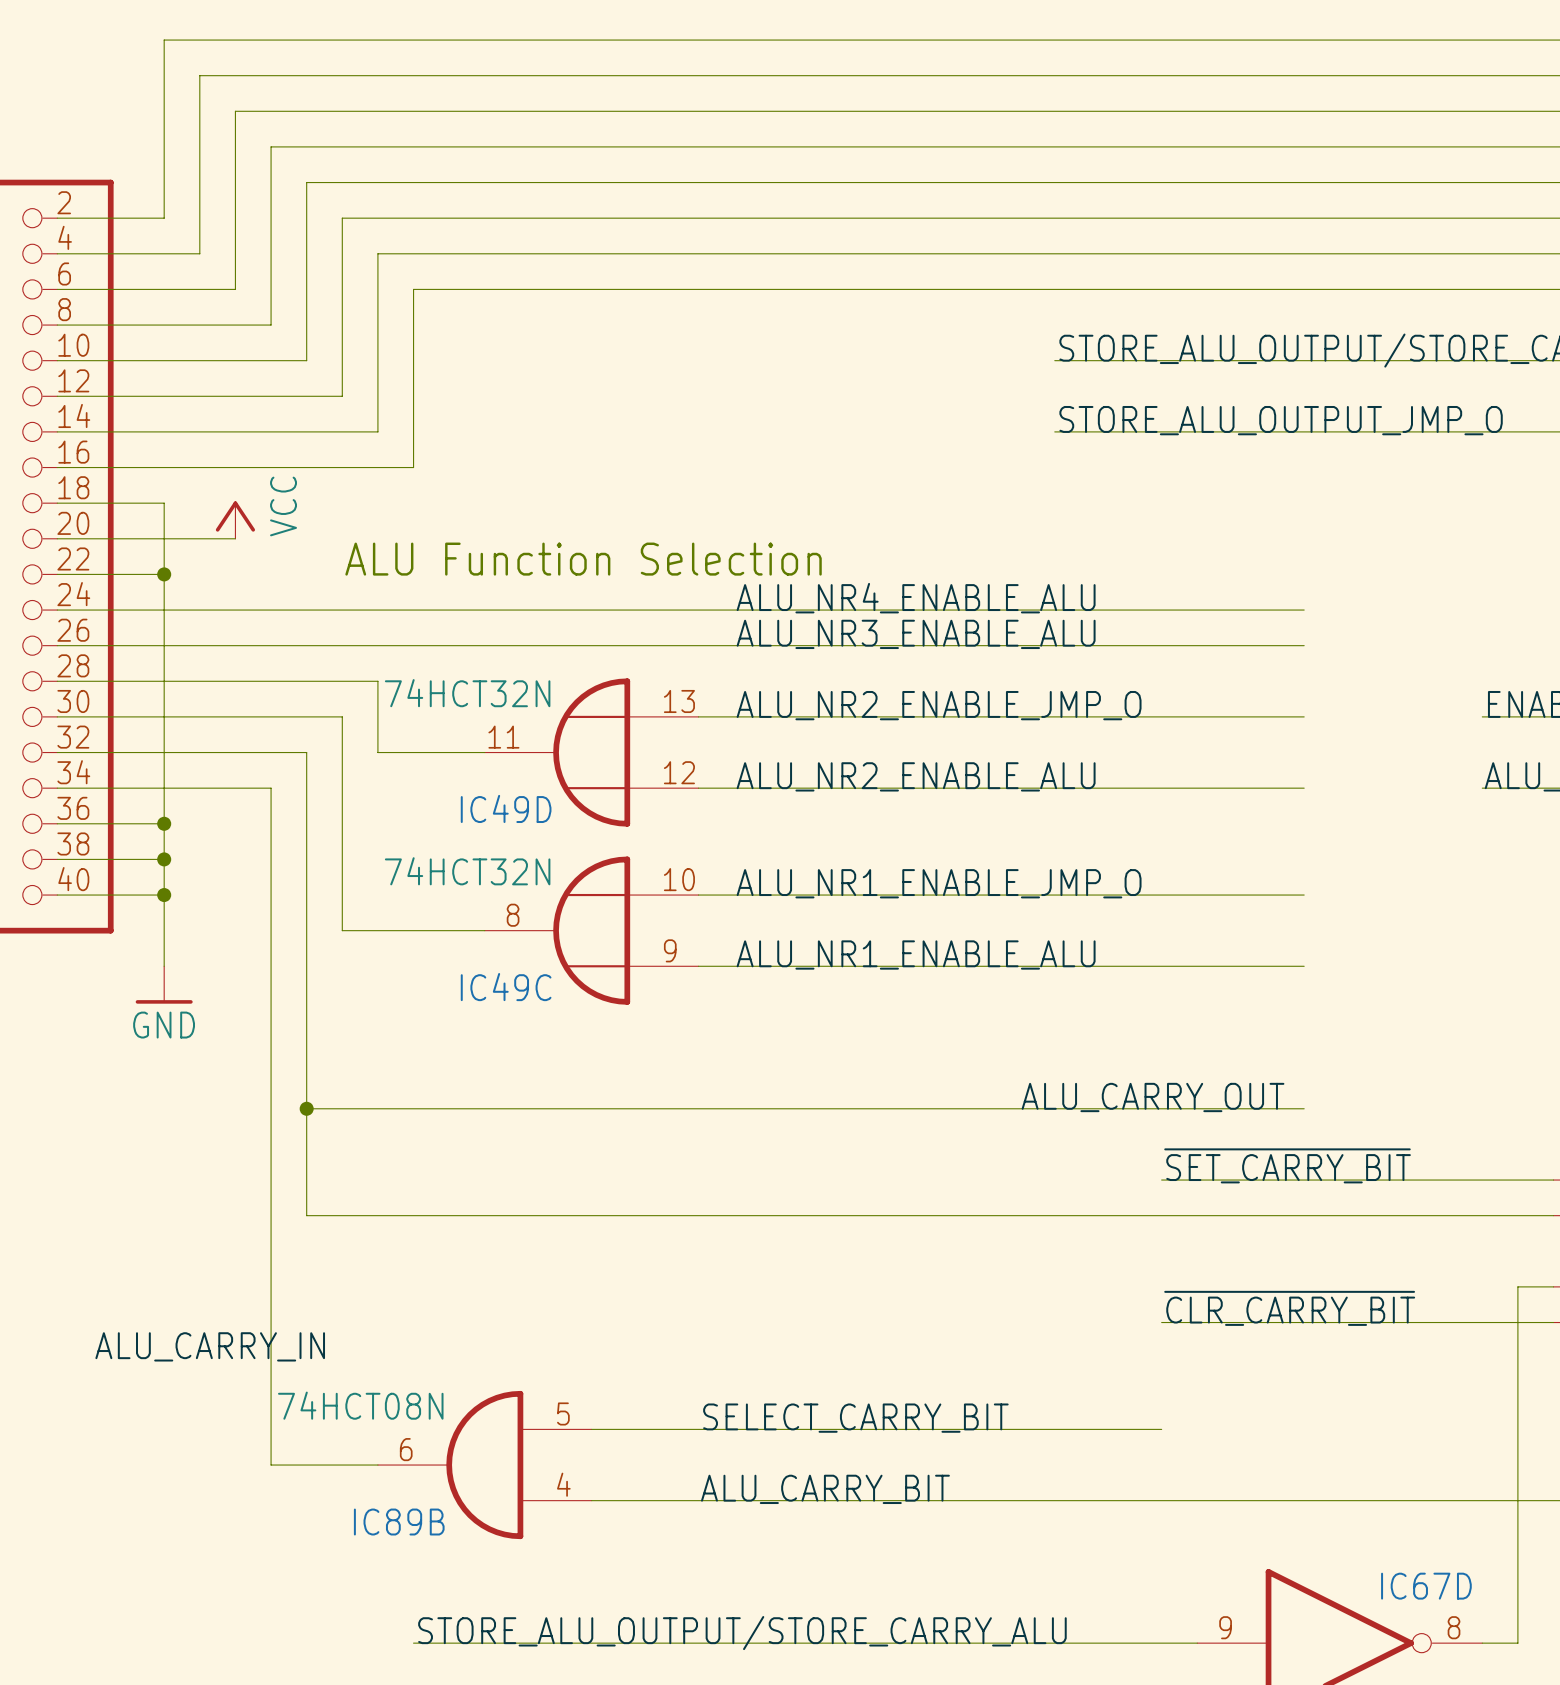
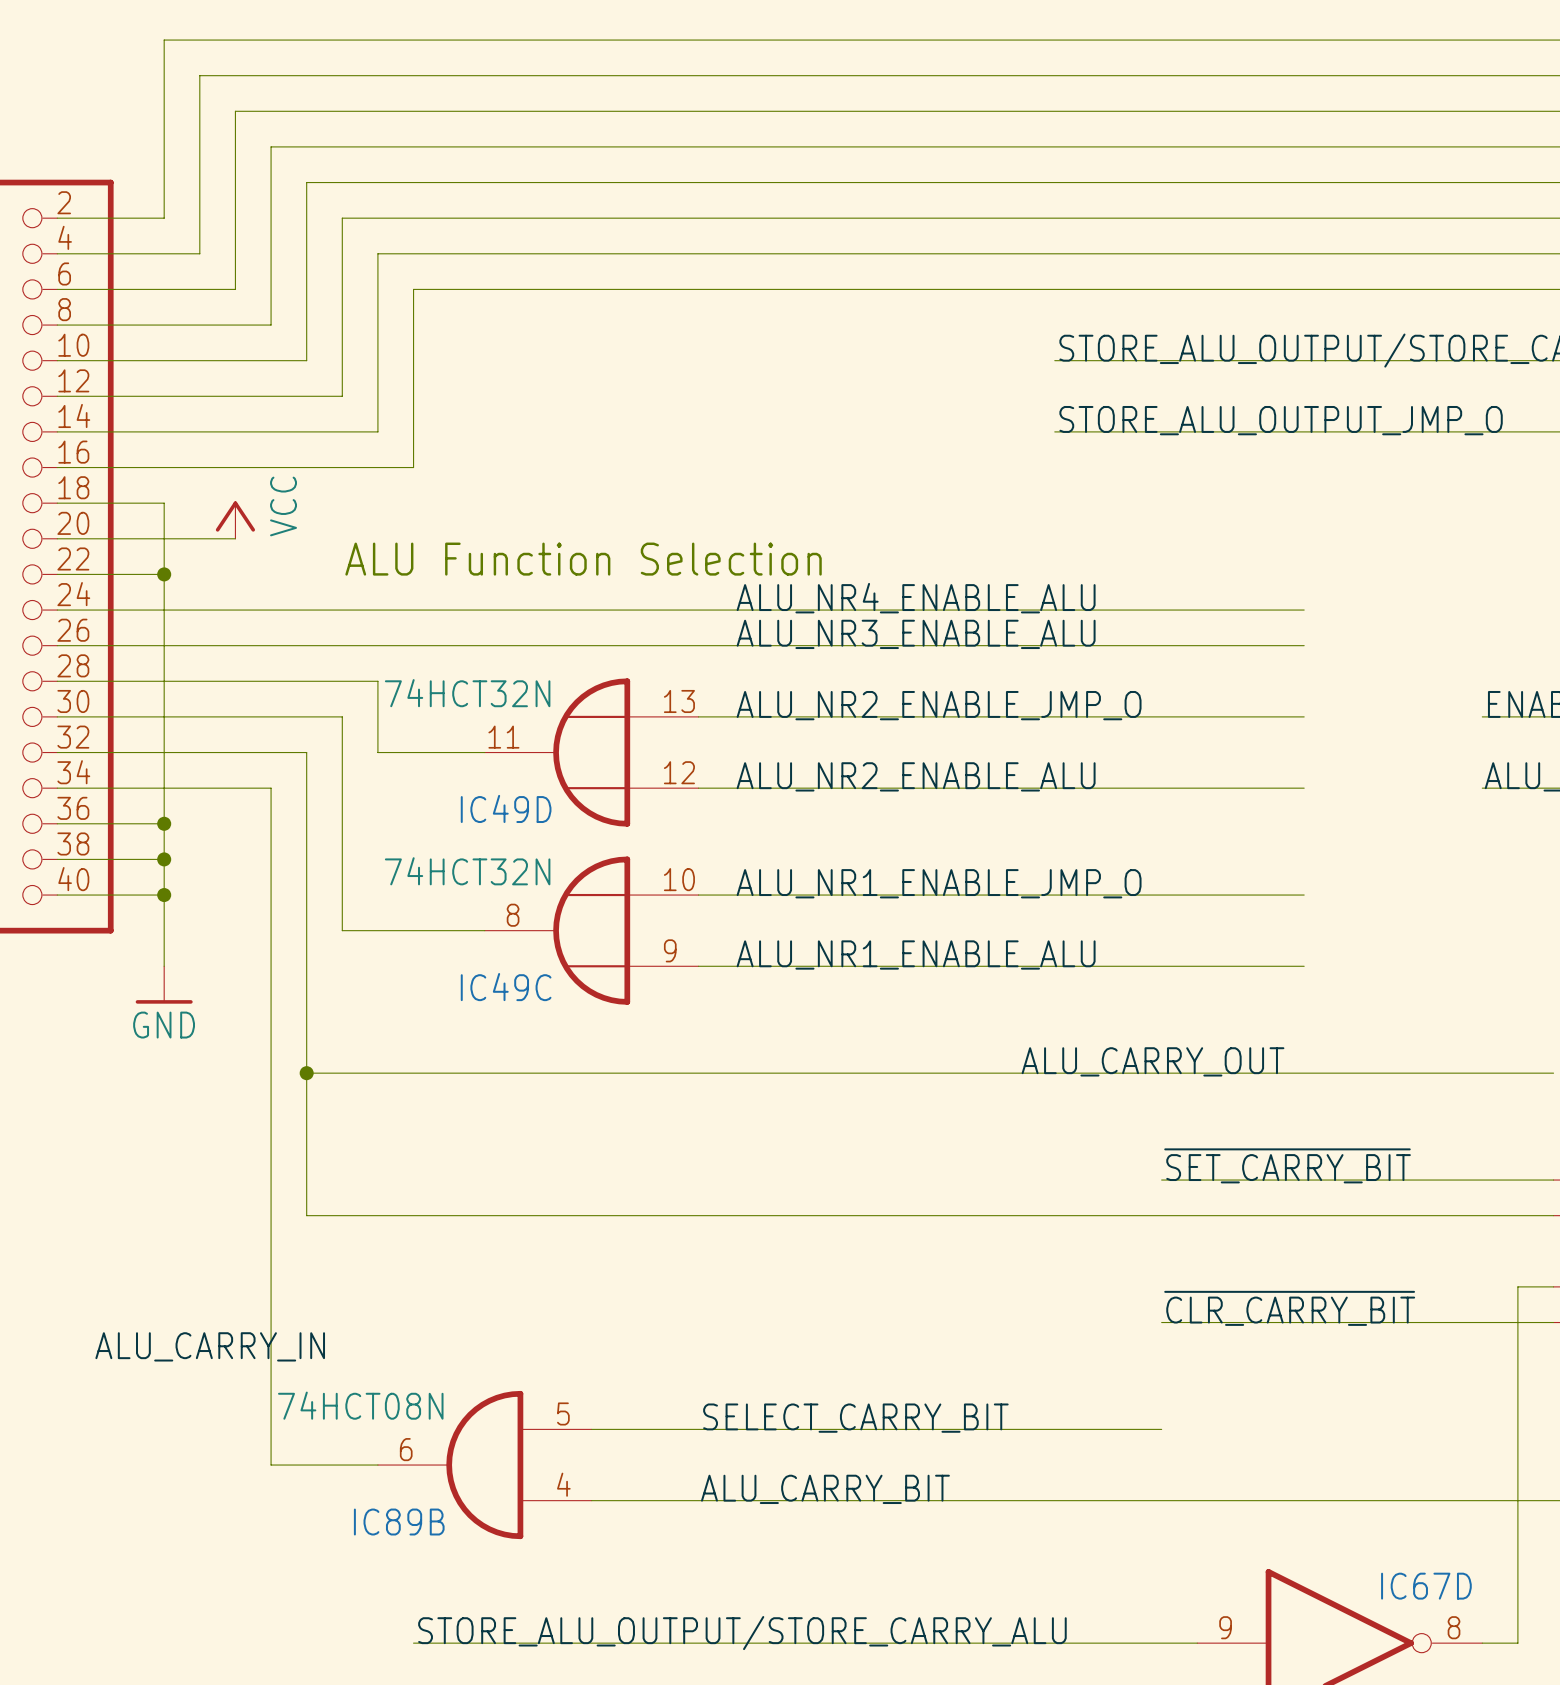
wire: none -> (306, 1073) (1553, 1073)
label position: ALU_CARRY_OUT (1153, 1097) -> ALU_CARRY_OUT (1153, 1061)
wire: (306, 1108) (1304, 1108) -> none
junction position: (306, 1108) -> (306, 1073)

